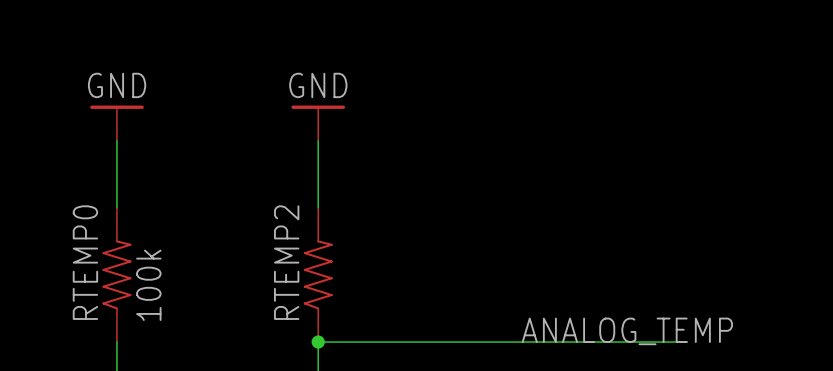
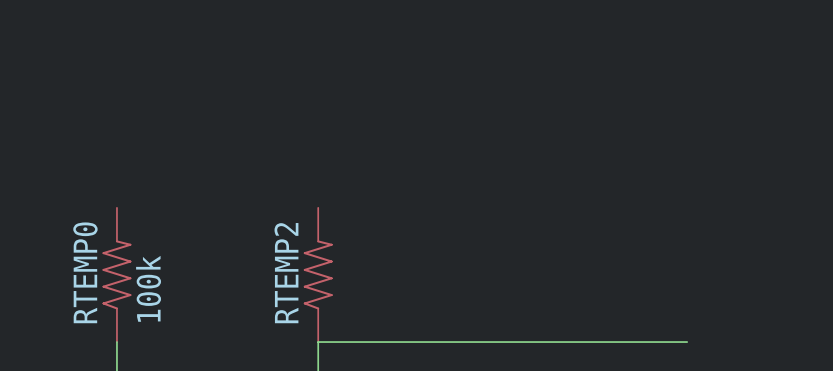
power symbol: GND (116, 123) -> none
power symbol: GND (318, 123) -> none
wire: (116, 140) (116, 207) -> none
wire: (318, 140) (318, 207) -> none
label: ANALOG_TEMP (627, 331) -> none
junction: (318, 342) -> none

